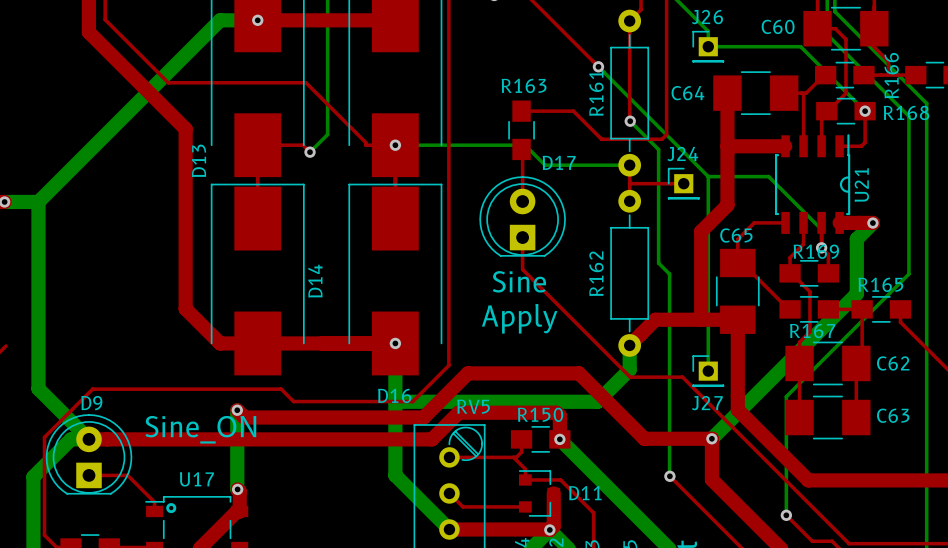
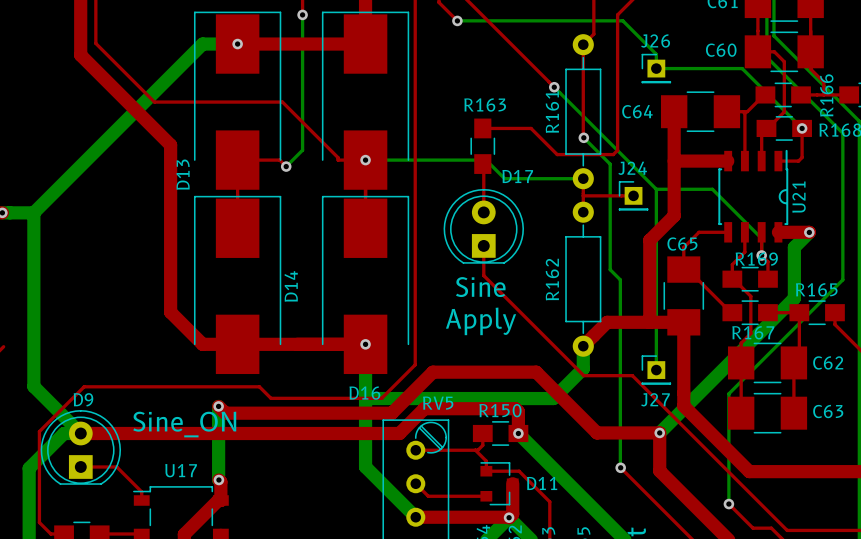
drawing: [166, 503, 177, 514] -> none

